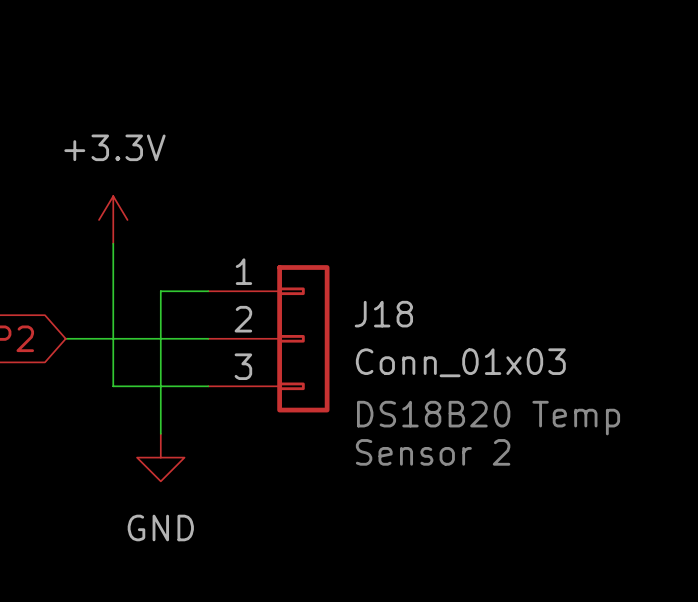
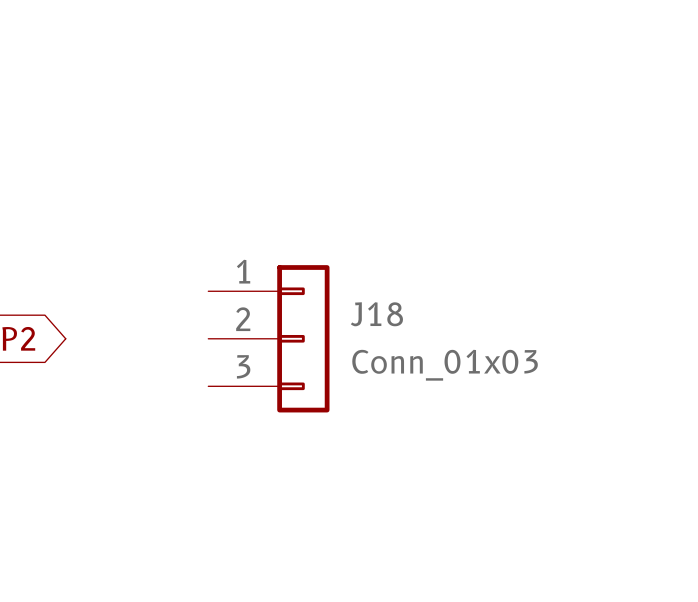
power symbol: +3.3V (113, 219) -> none
wire: (113, 243) (113, 386) (208, 386) -> none
wire: (208, 291) (160, 291) (160, 433) -> none
wire: (65, 338) (208, 338) -> none
text: DS18B20 Temp (488, 418) -> none
text: Sensor 2 (433, 452) -> none
power symbol: GND (160, 457) -> none

